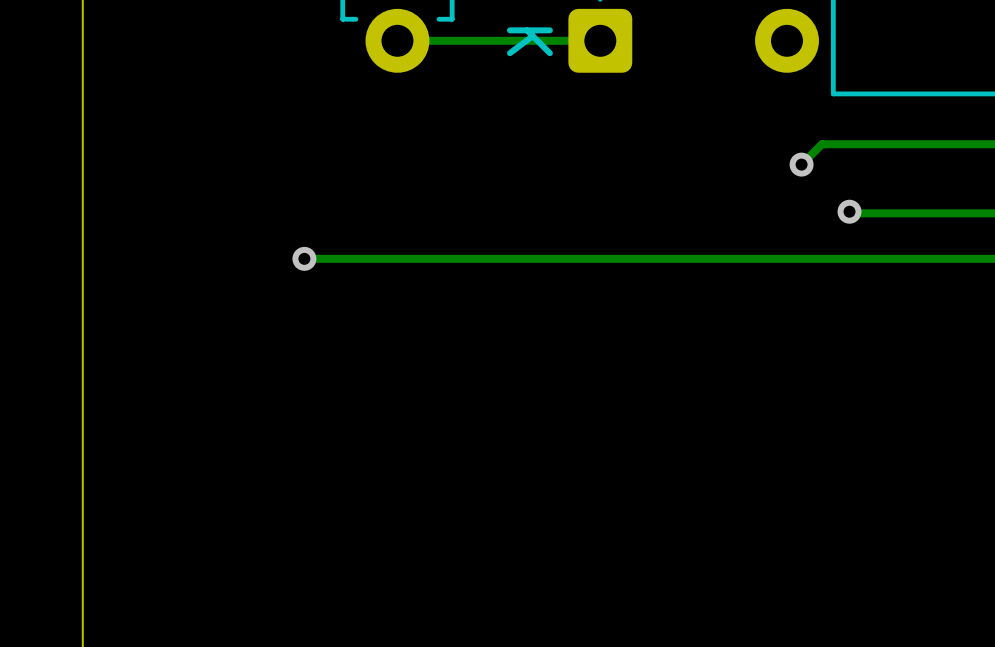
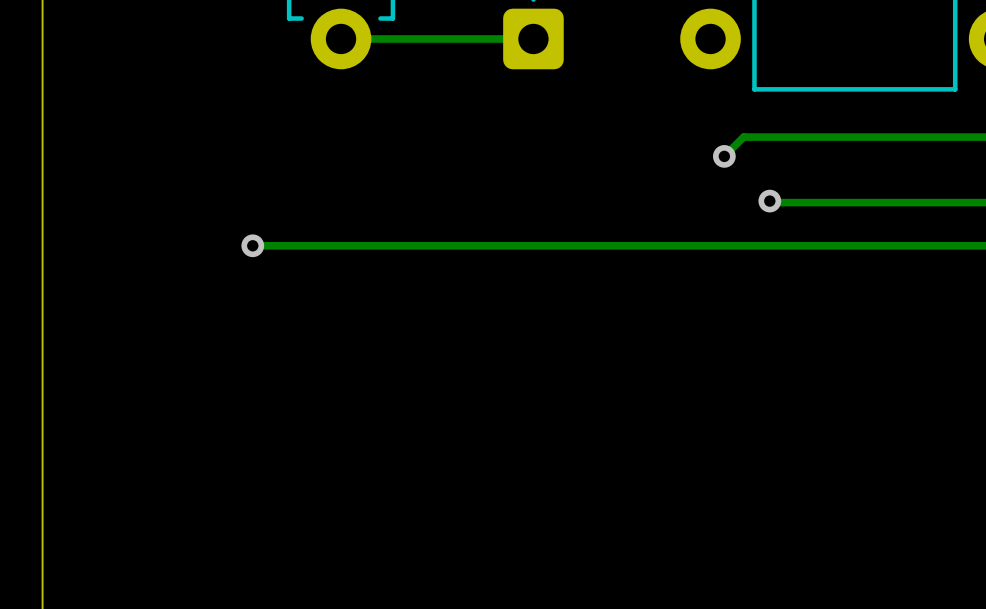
part text: K (529, 41) -> none

